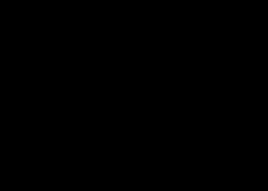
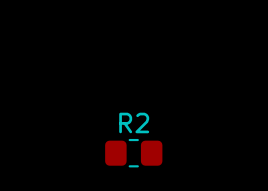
R2: none -> (133, 153)

